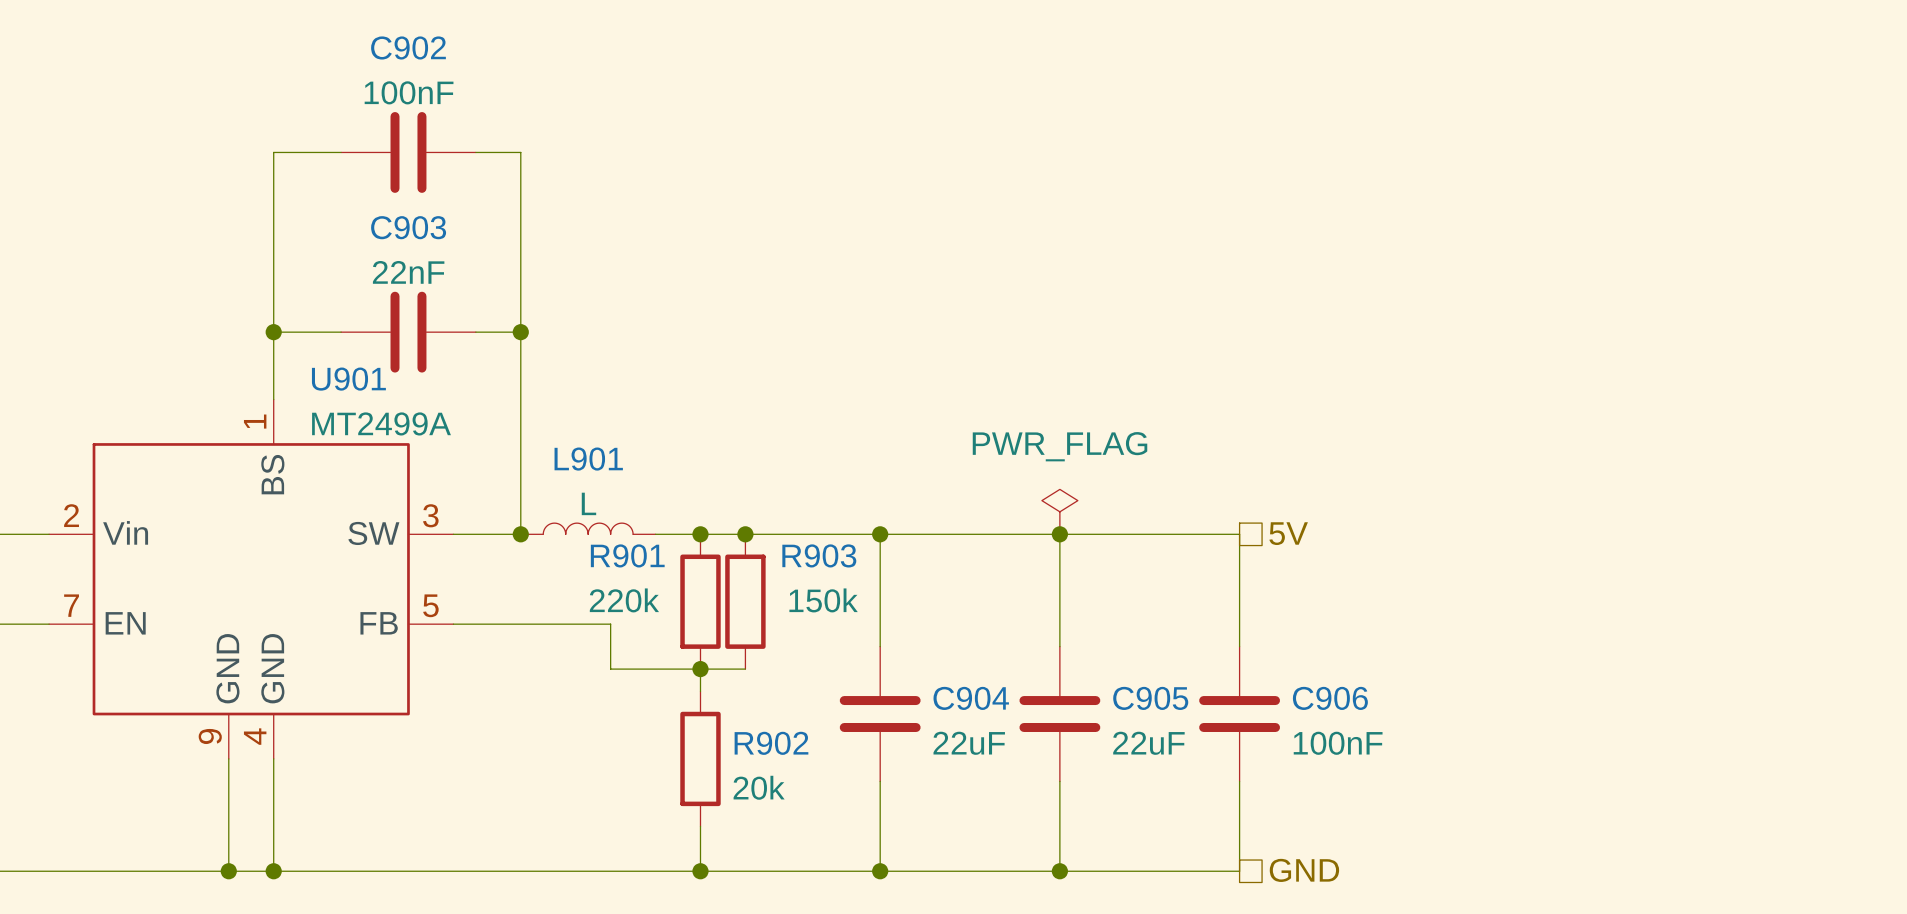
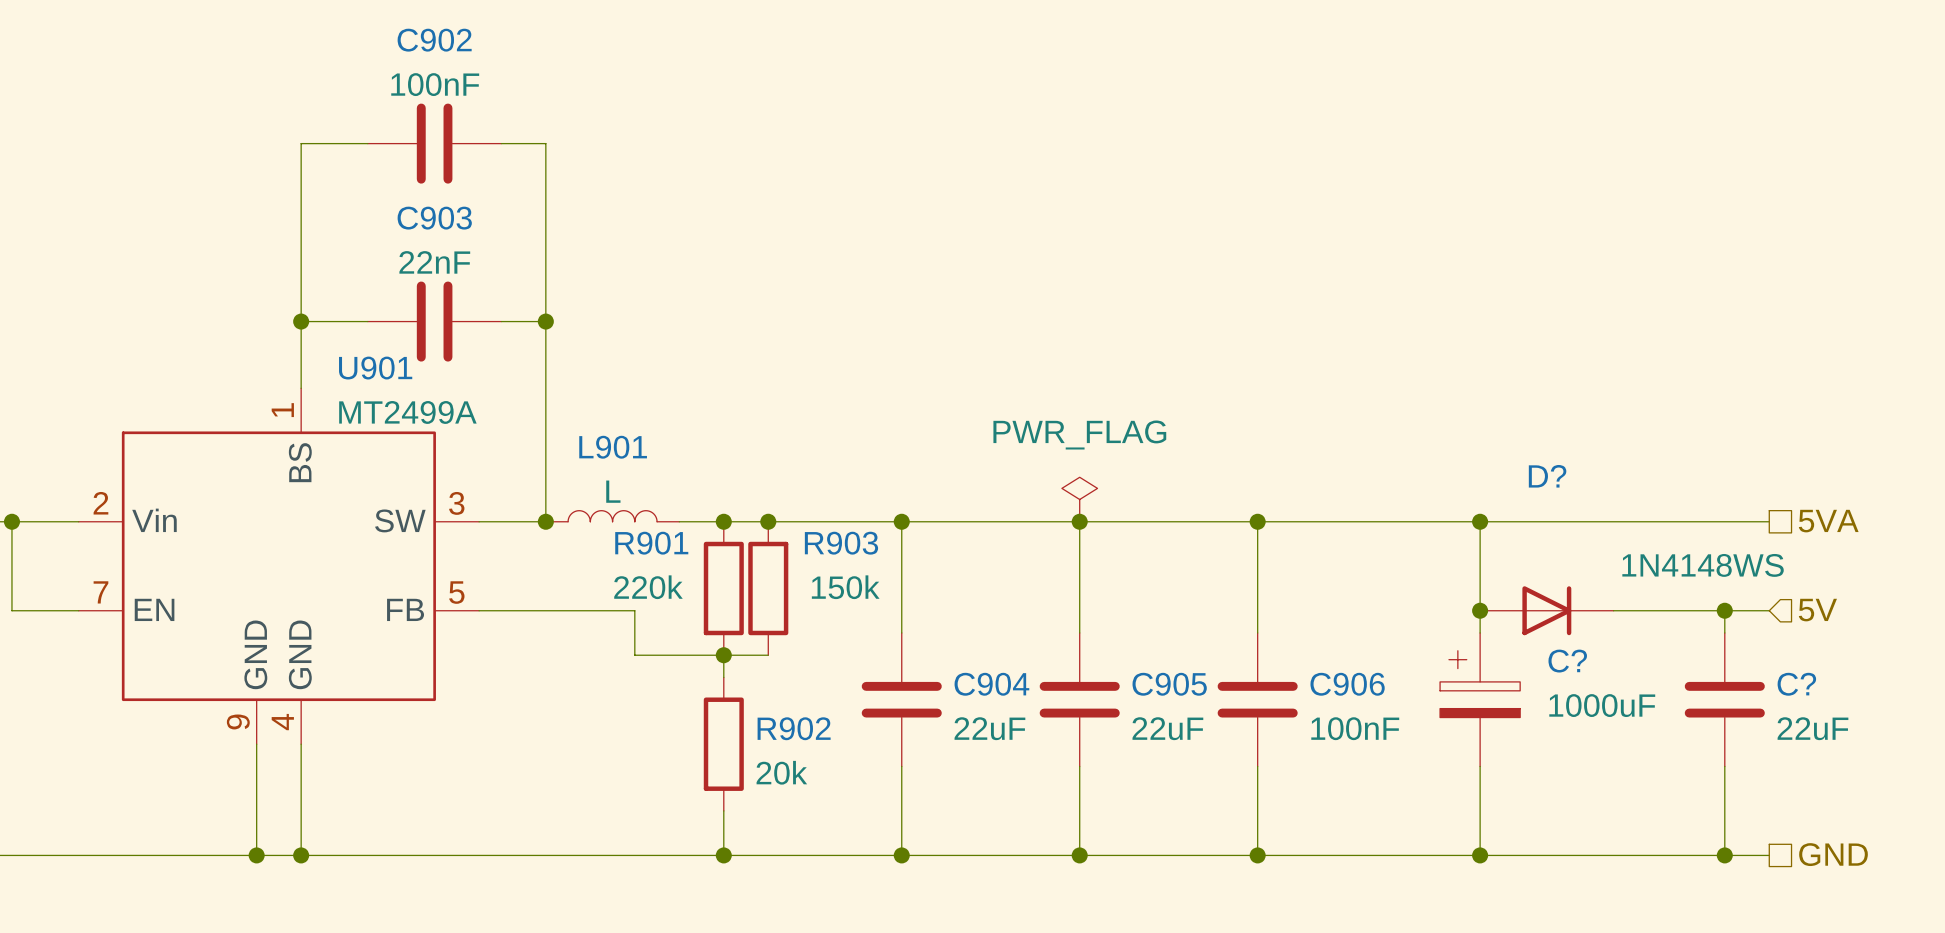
hierarchical label: 5V (1288, 533) -> none
hierarchical label: none -> 5VA (1828, 521)
wire: none -> (1257, 521) (1769, 521)
junction: none -> (1257, 521)
wire: none -> (1480, 521) (1480, 632)
junction: none -> (1480, 521)
hierarchical label: none -> 5V (1817, 610)
junction: none -> (1480, 610)
D?: none -> 1N4148WS (1546, 610)
wire: none -> (1613, 610) (1769, 610)
wire: none -> (1724, 610) (1724, 632)
junction: none -> (1724, 610)
C?: none -> 1000uF (1480, 699)
C?: none -> 22uF (1724, 699)
wire: none -> (1480, 766) (1480, 855)
wire: none -> (1724, 766) (1724, 855)
hierarchical label: GND (1304, 870) -> none
hierarchical label: none -> GND (1833, 854)
wire: none -> (1257, 855) (1769, 855)
junction: none -> (1257, 855)
junction: none -> (1480, 855)
junction: none -> (1724, 855)

